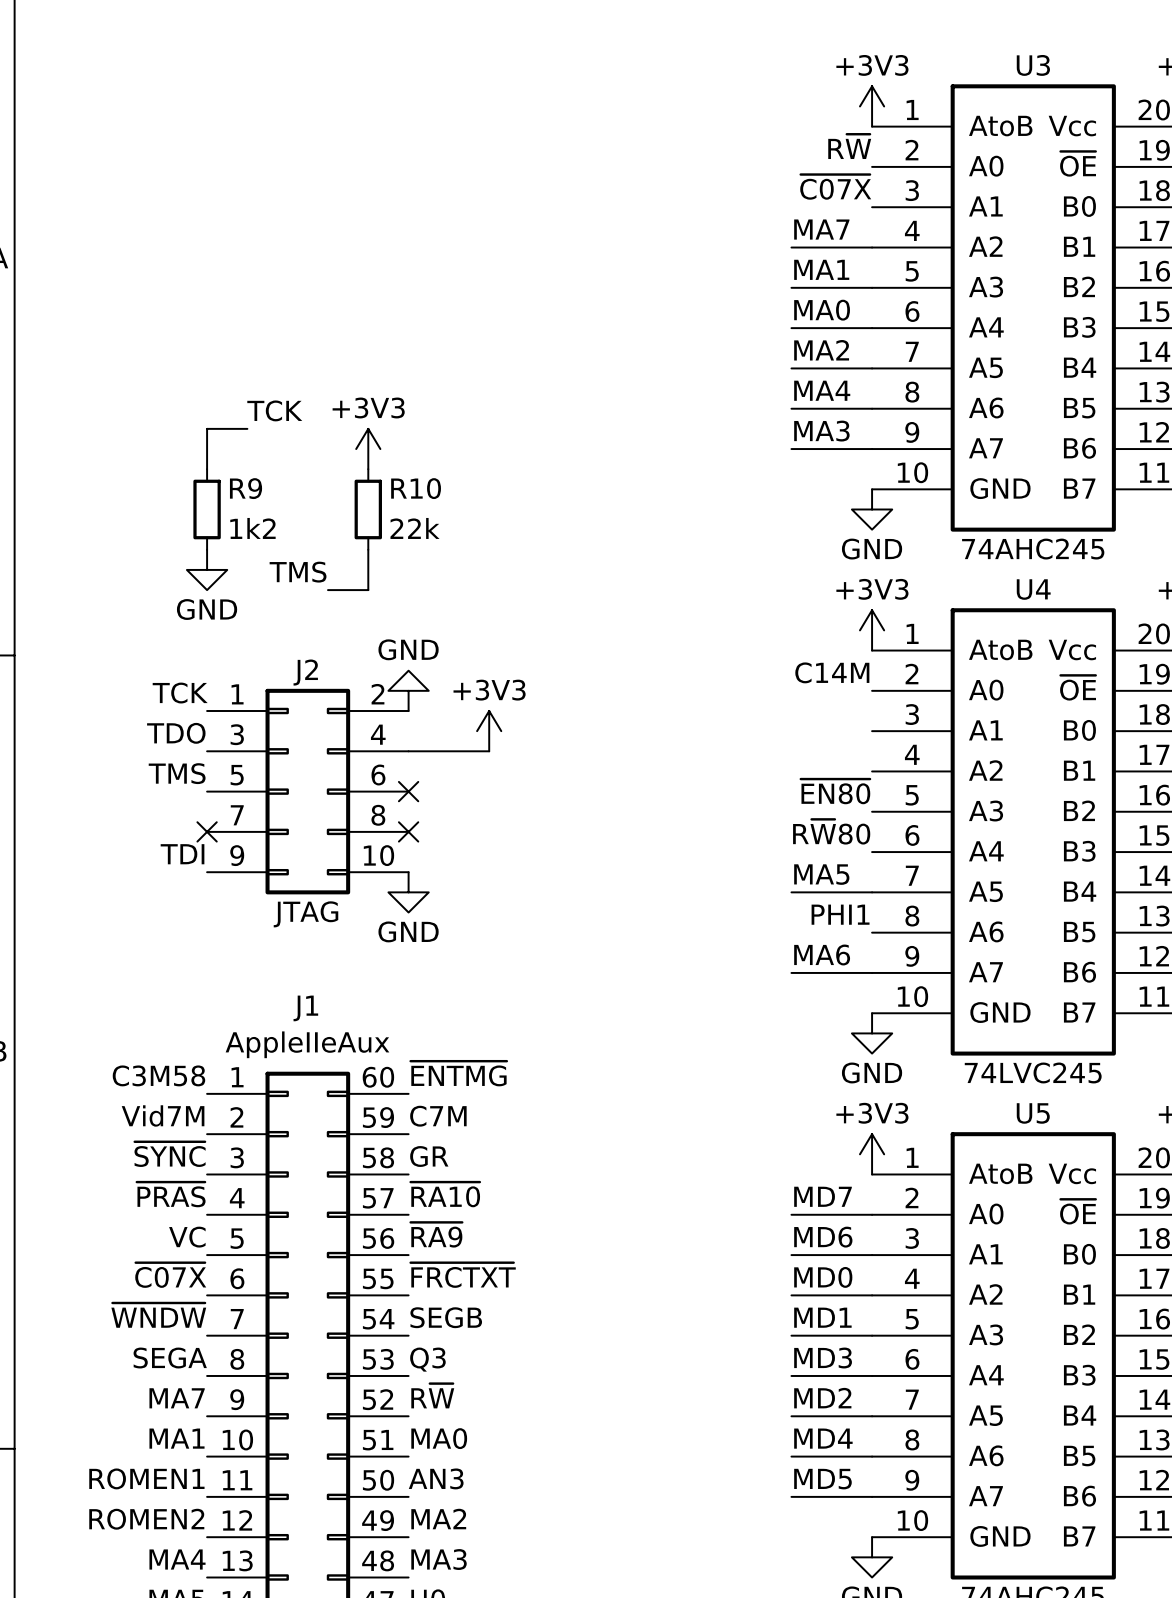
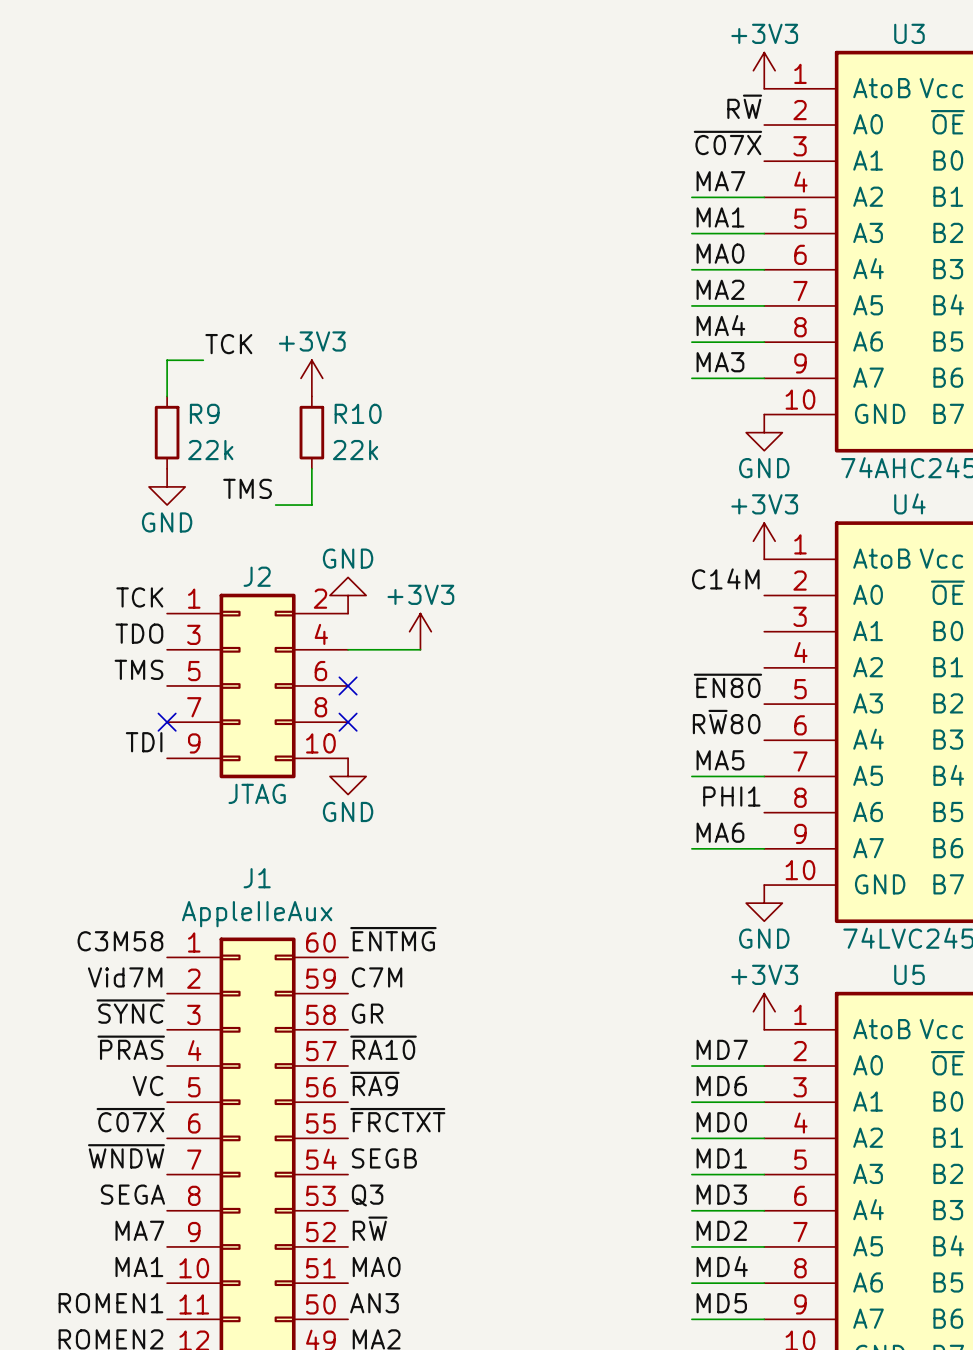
R9 value: 1k2 (252, 528) -> 22k (210, 450)

